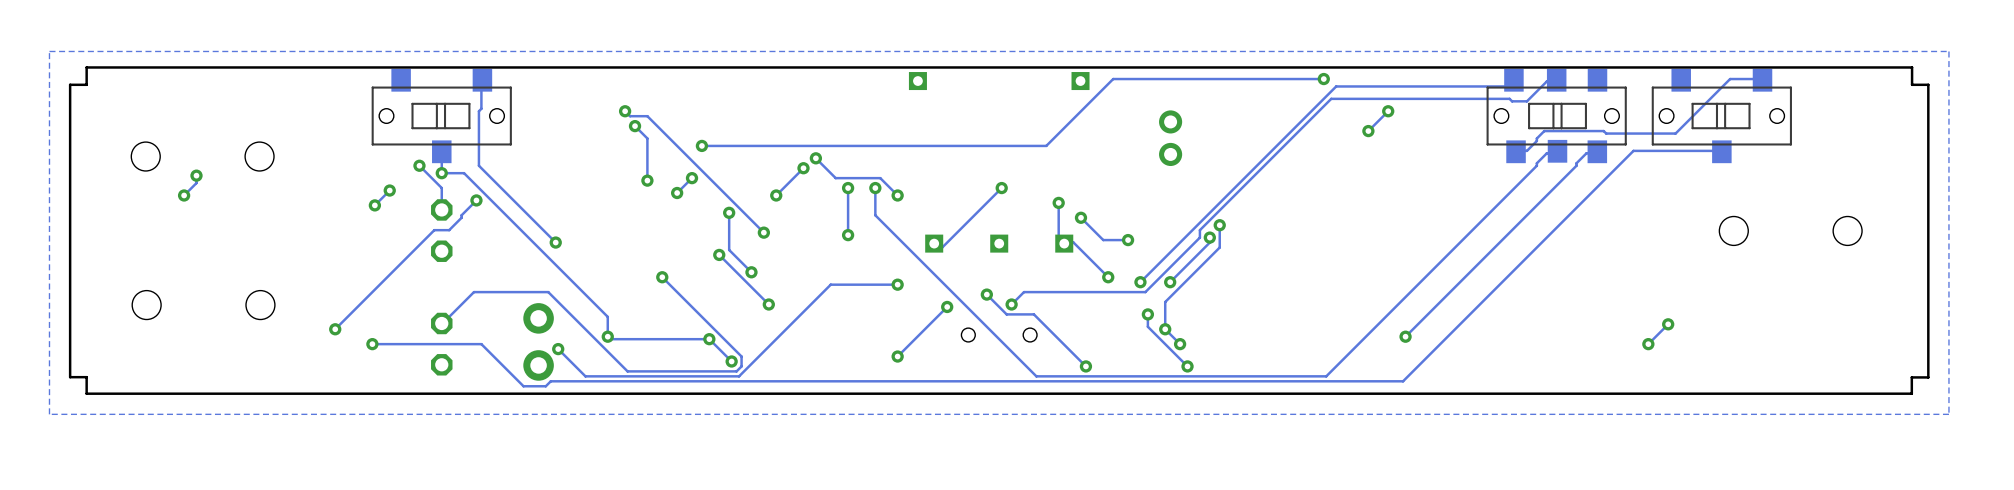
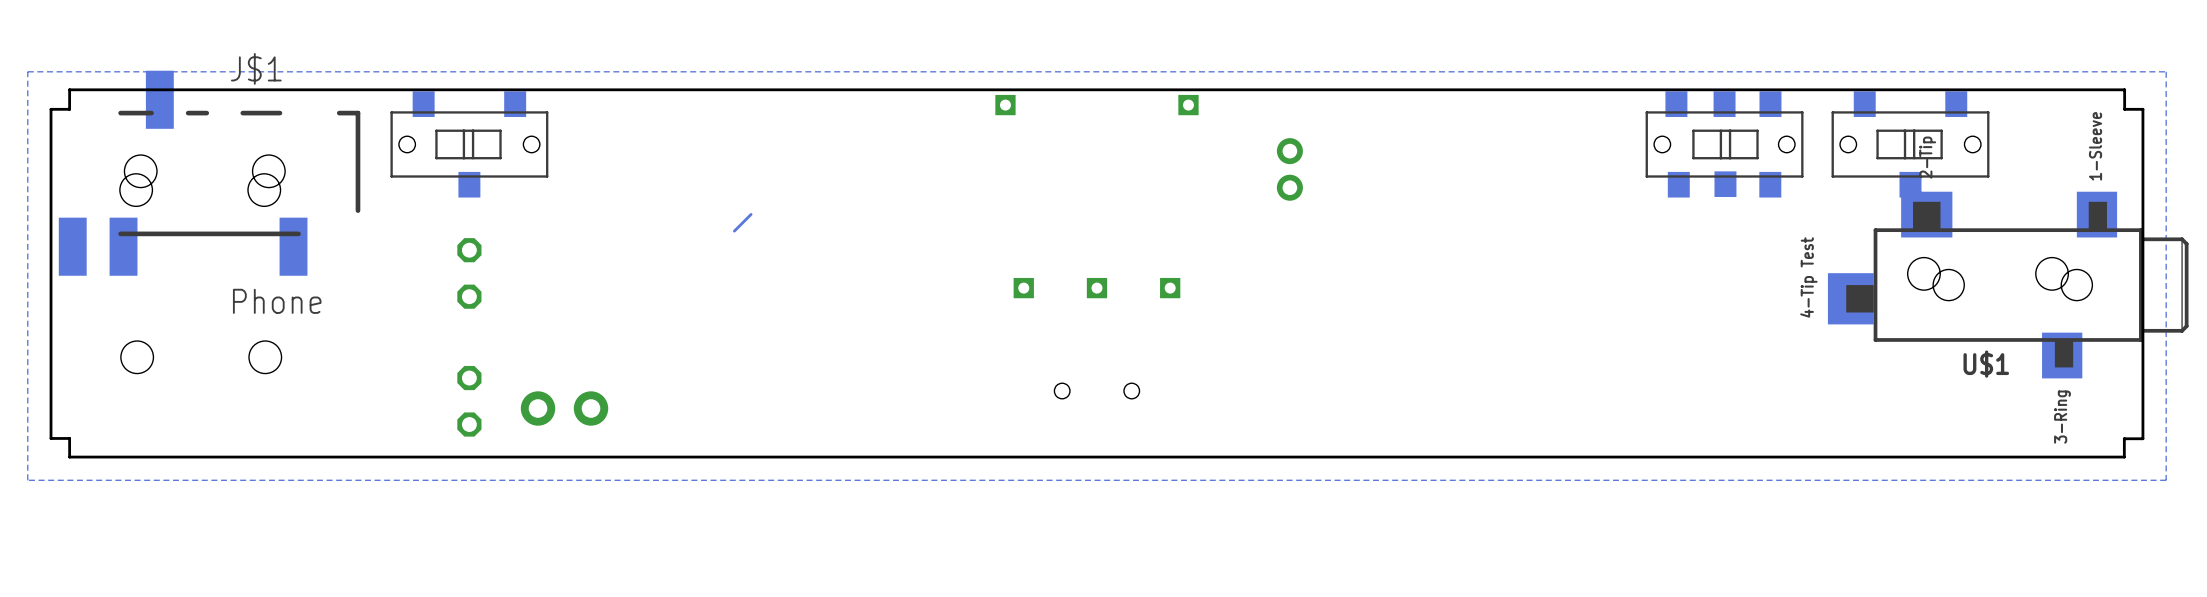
track: (1323, 79) (1113, 79) (1046, 145) (701, 145) -> none
via: (1323, 79) -> none
track: (482, 80) (481, 108) (478, 111) (478, 165) (555, 242) -> none
track: (1513, 80) (1507, 86) (1336, 86) (1140, 282) -> none
track: (1556, 80) (1546, 81) (1526, 101) (1512, 101) (1509, 98) (1331, 98) (1199, 230) (1199, 237) (1145, 292) (1024, 292) (1011, 304) -> none
track: (1762, 80) (1730, 79) (1675, 133) (1544, 131) (1526, 150) (1516, 151) -> none
track: (625, 111) (630, 116) (647, 116) (763, 232) -> none
via: (625, 111) -> none
track: (1388, 111) (1368, 131) -> none
via: (1388, 111) -> none
track: (635, 126) (647, 138) (647, 180) -> none
via: (635, 126) -> none
via: (1368, 131) -> none
J$1: none -> Phone (209, 173)
via: (701, 145) -> none
track: (441, 151) (441, 173) (464, 173) (607, 316) (607, 336) (610, 339) (709, 339) (731, 361) -> none
track: (1557, 151) (1556, 153) (1546, 153) (1536, 163) (1536, 165) (1326, 376) (1036, 376) (875, 215) (875, 188) -> none
track: (1597, 151) (1586, 153) (1576, 163) (1576, 165) (1405, 336) -> none
track: (1721, 151) (1633, 150) (1403, 381) (550, 381) (545, 386) (523, 386) (481, 344) (372, 344) -> none
track: (815, 158) (835, 178) (880, 178) (897, 195) -> none
via: (815, 158) -> none
track: (419, 165) (441, 188) (441, 209) -> none
via: (419, 165) -> none
track: (803, 168) (776, 195) -> none
via: (803, 168) -> none
via: (441, 173) -> none
track: (196, 175) (196, 183) (184, 195) -> none
via: (196, 175) -> none
via: (692, 178) -> none
via: (647, 180) -> none
track: (848, 188) (848, 235) -> none
via: (848, 188) -> none
via: (875, 188) -> none
track: (1001, 188) (942, 247) (937, 247) (934, 243) -> none
via: (1001, 188) -> none
track: (389, 190) (374, 205) -> none
via: (389, 190) -> none
via: (677, 193) -> none
via: (184, 195) -> none
via: (776, 195) -> none
via: (897, 195) -> none
track: (476, 200) (449, 230) (434, 230) (335, 329) -> none
via: (476, 200) -> none
track: (1058, 202) (1058, 237) (1064, 243) (1073, 242) (1108, 277) -> none
via: (1058, 202) -> none
via: (374, 205) -> none
track: (729, 212) (729, 249) (751, 272) -> none
via: (729, 212) -> none
track: (1080, 217) (1103, 240) (1128, 240) -> none
via: (1080, 217) -> none
track: (1219, 225) (1219, 247) (1165, 302) (1165, 329) (1180, 344) -> none
via: (1219, 225) -> none
via: (763, 232) -> none
via: (848, 235) -> none
track: (1209, 237) (1209, 242) (1170, 282) -> none
via: (1209, 237) -> none
via: (1128, 240) -> none
U$1: none -> (2008, 285)
via: (555, 242) -> none
track: (719, 254) (768, 304) -> none
via: (719, 254) -> none
via: (751, 272) -> none
track: (662, 277) (741, 356) (741, 366) (736, 371) (627, 371) (548, 292) (473, 292) (441, 323) -> none
via: (662, 277) -> none
via: (1108, 277) -> none
via: (1140, 282) -> none
via: (1170, 282) -> none
track: (897, 284) (830, 284) (739, 376) (585, 376) (558, 349) -> none
via: (897, 284) -> none
track: (986, 294) (1006, 314) (1033, 314) (1085, 366) -> none
via: (986, 294) -> none
via: (768, 304) -> none
via: (1011, 304) -> none
track: (947, 306) (897, 356) -> none
via: (947, 306) -> none
track: (1147, 314) (1147, 326) (1187, 366) -> none
via: (1147, 314) -> none
track: (1668, 324) (1648, 344) -> none
via: (1668, 324) -> none
via: (335, 329) -> none
via: (1165, 329) -> none
via: (607, 336) -> none
via: (1405, 336) -> none
via: (709, 339) -> none
part rotation: 0° (538, 341) -> 90° clockwise (564, 408)
via: (372, 344) -> none
via: (1180, 344) -> none
via: (1648, 344) -> none
via: (558, 349) -> none
via: (897, 356) -> none
via: (731, 361) -> none
via: (1085, 366) -> none
via: (1187, 366) -> none

